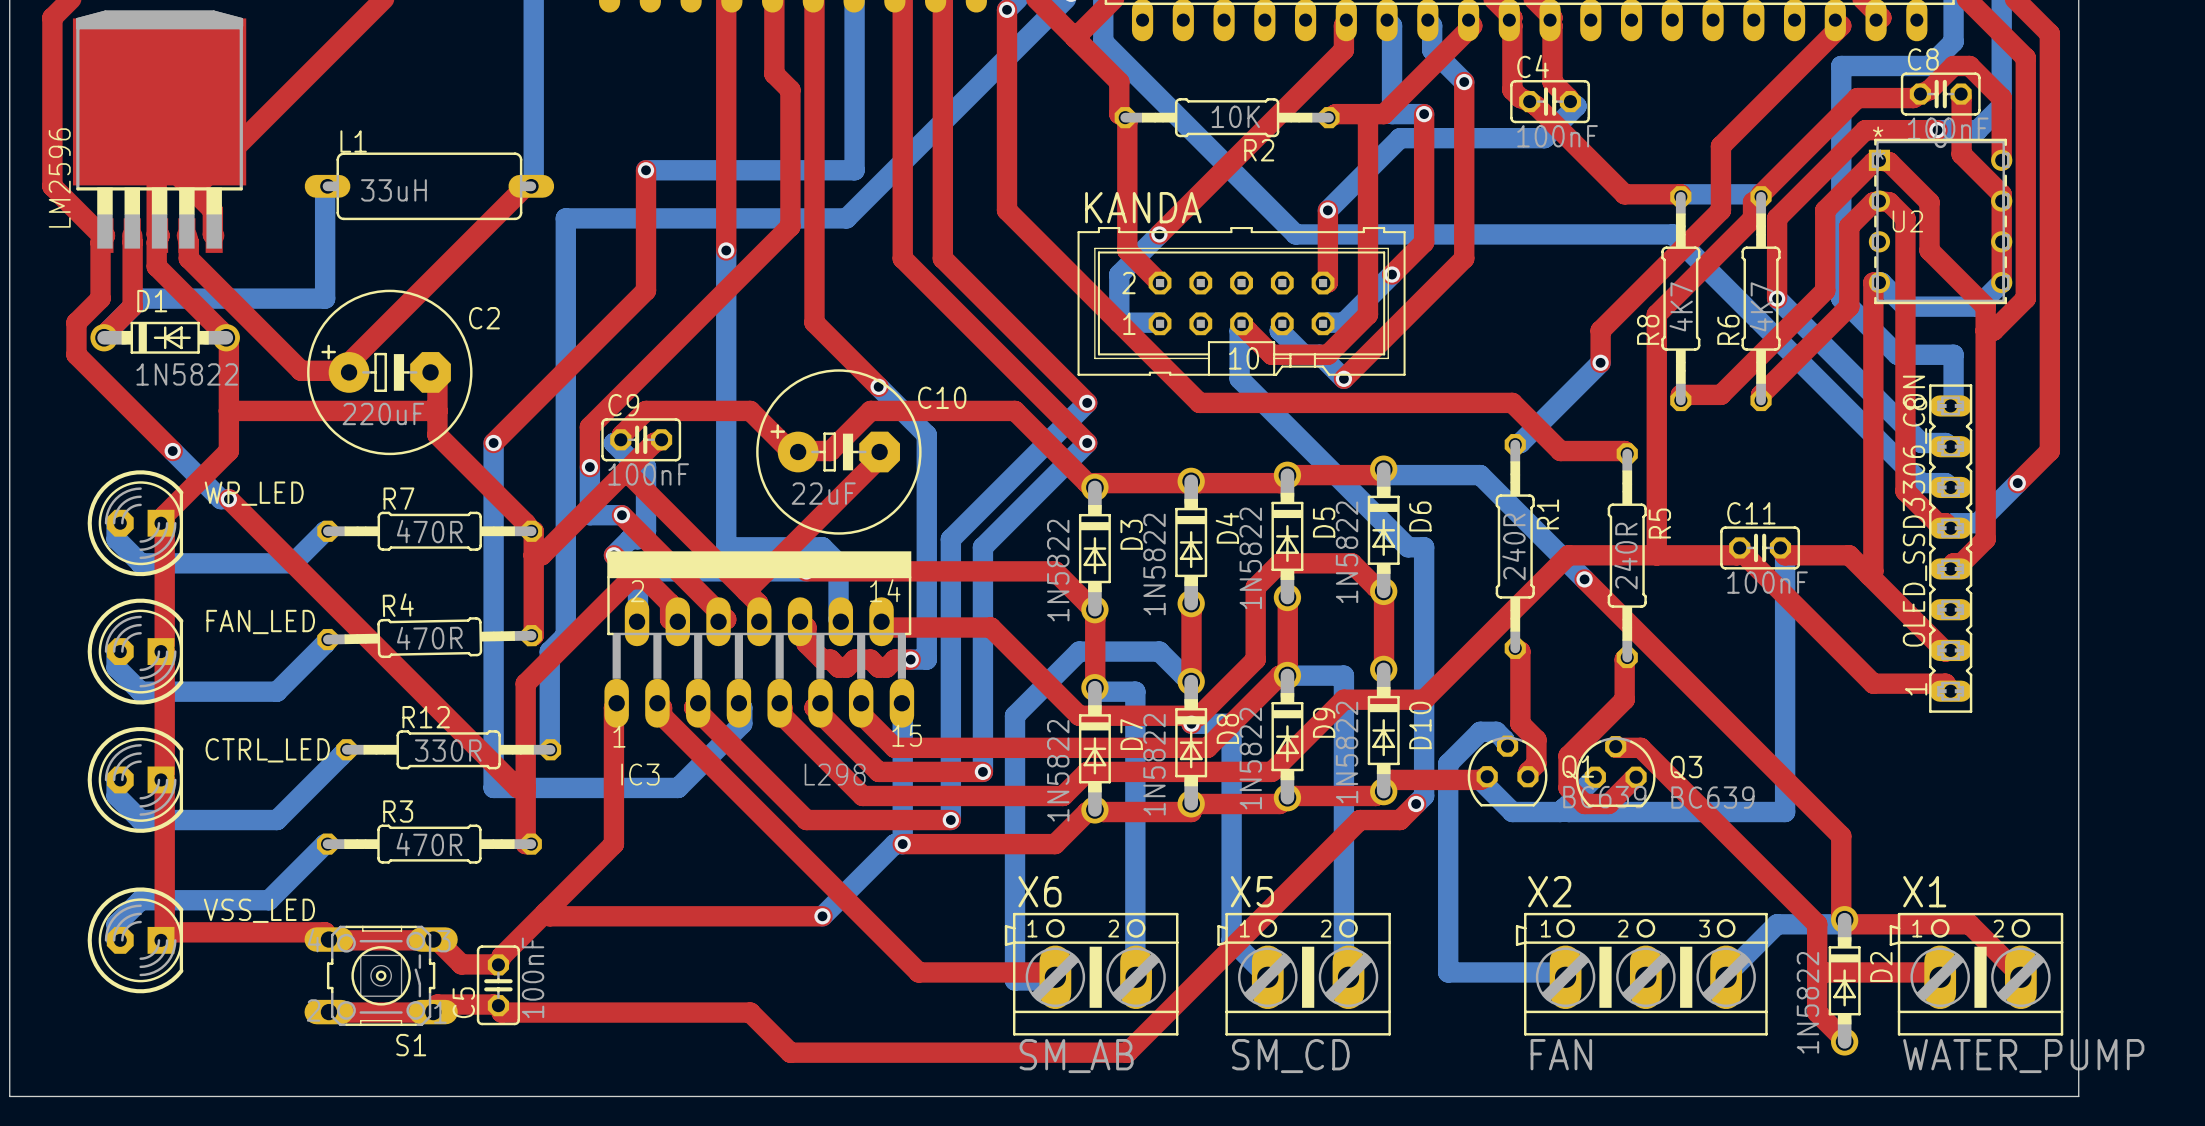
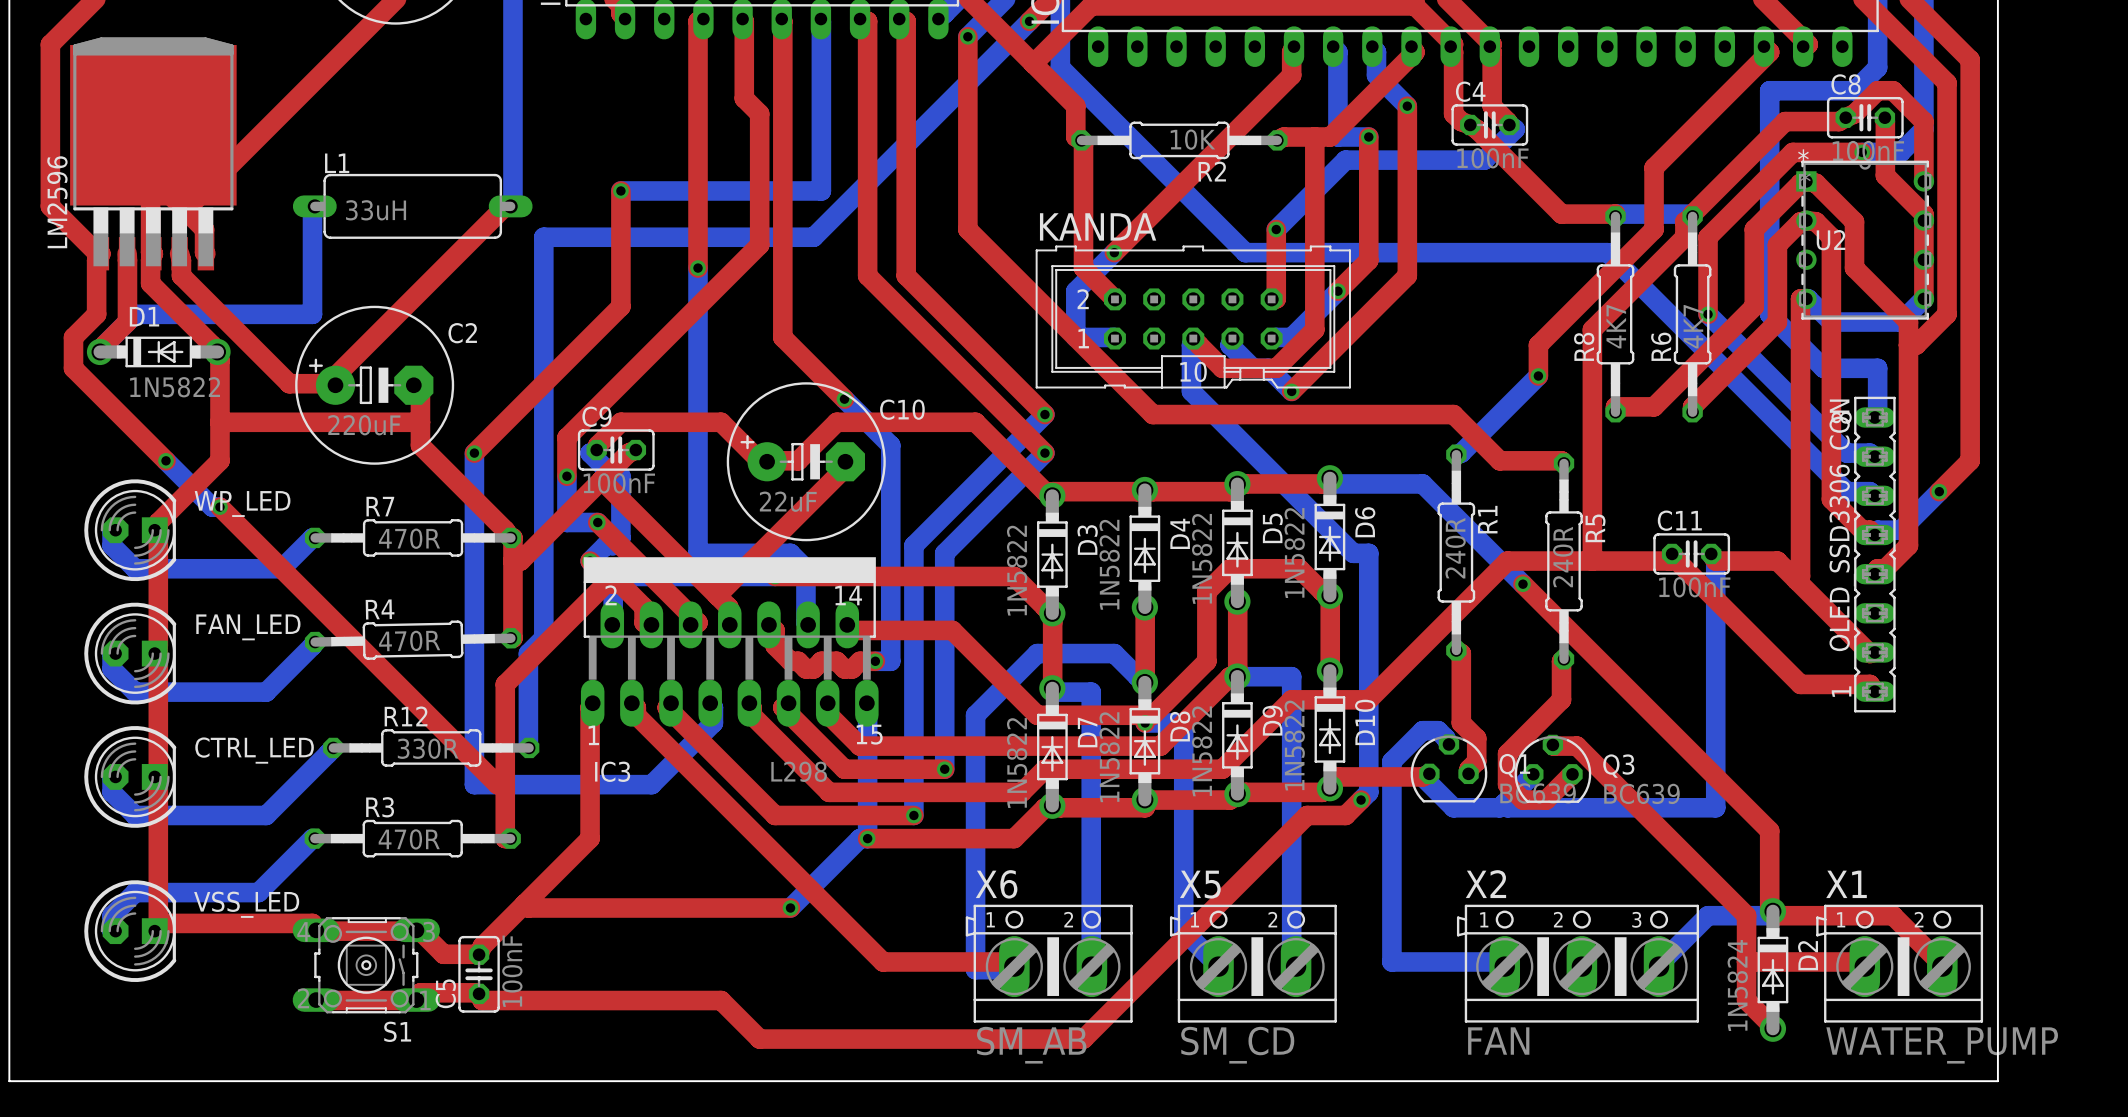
D2 value: 1N5822 (1807, 1002) -> 1N5824 (1737, 985)

